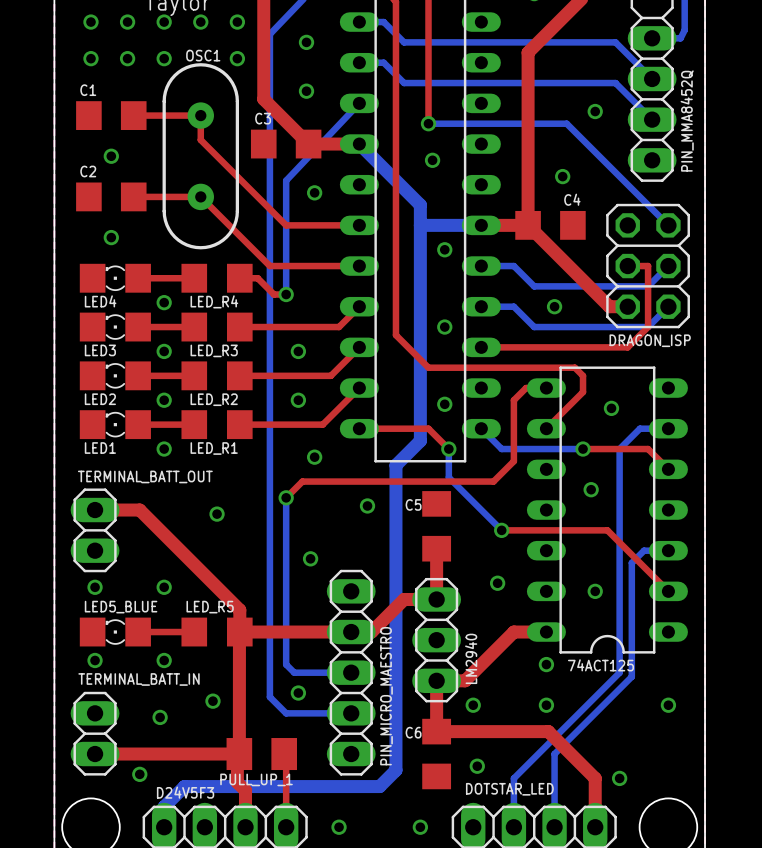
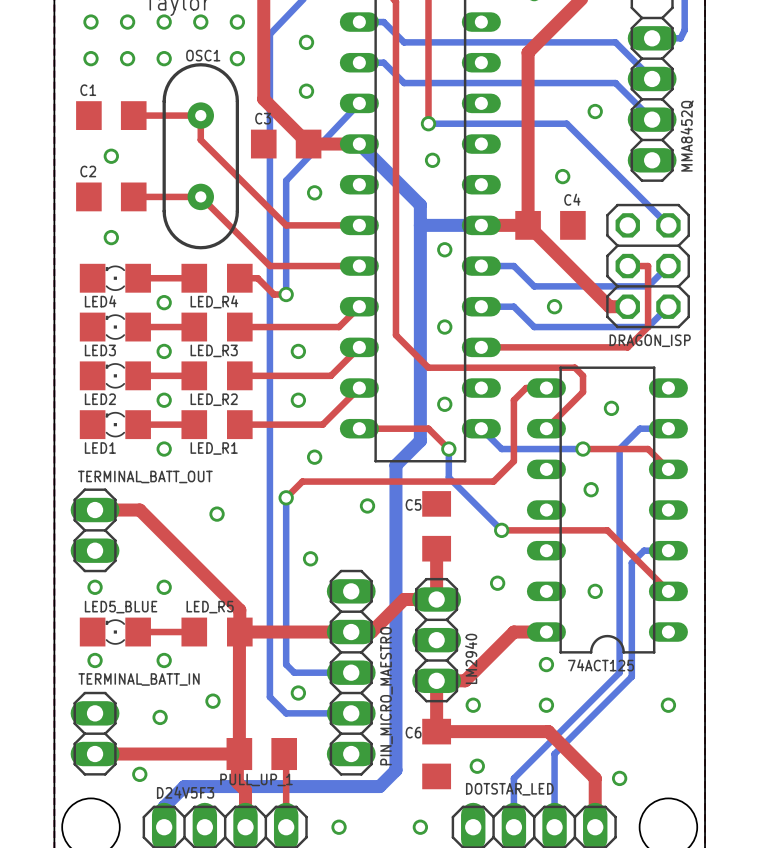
PIN_MMA8452Q name: PIN_MMA8452Q (687, 121) -> MMA8452Q (687, 136)

